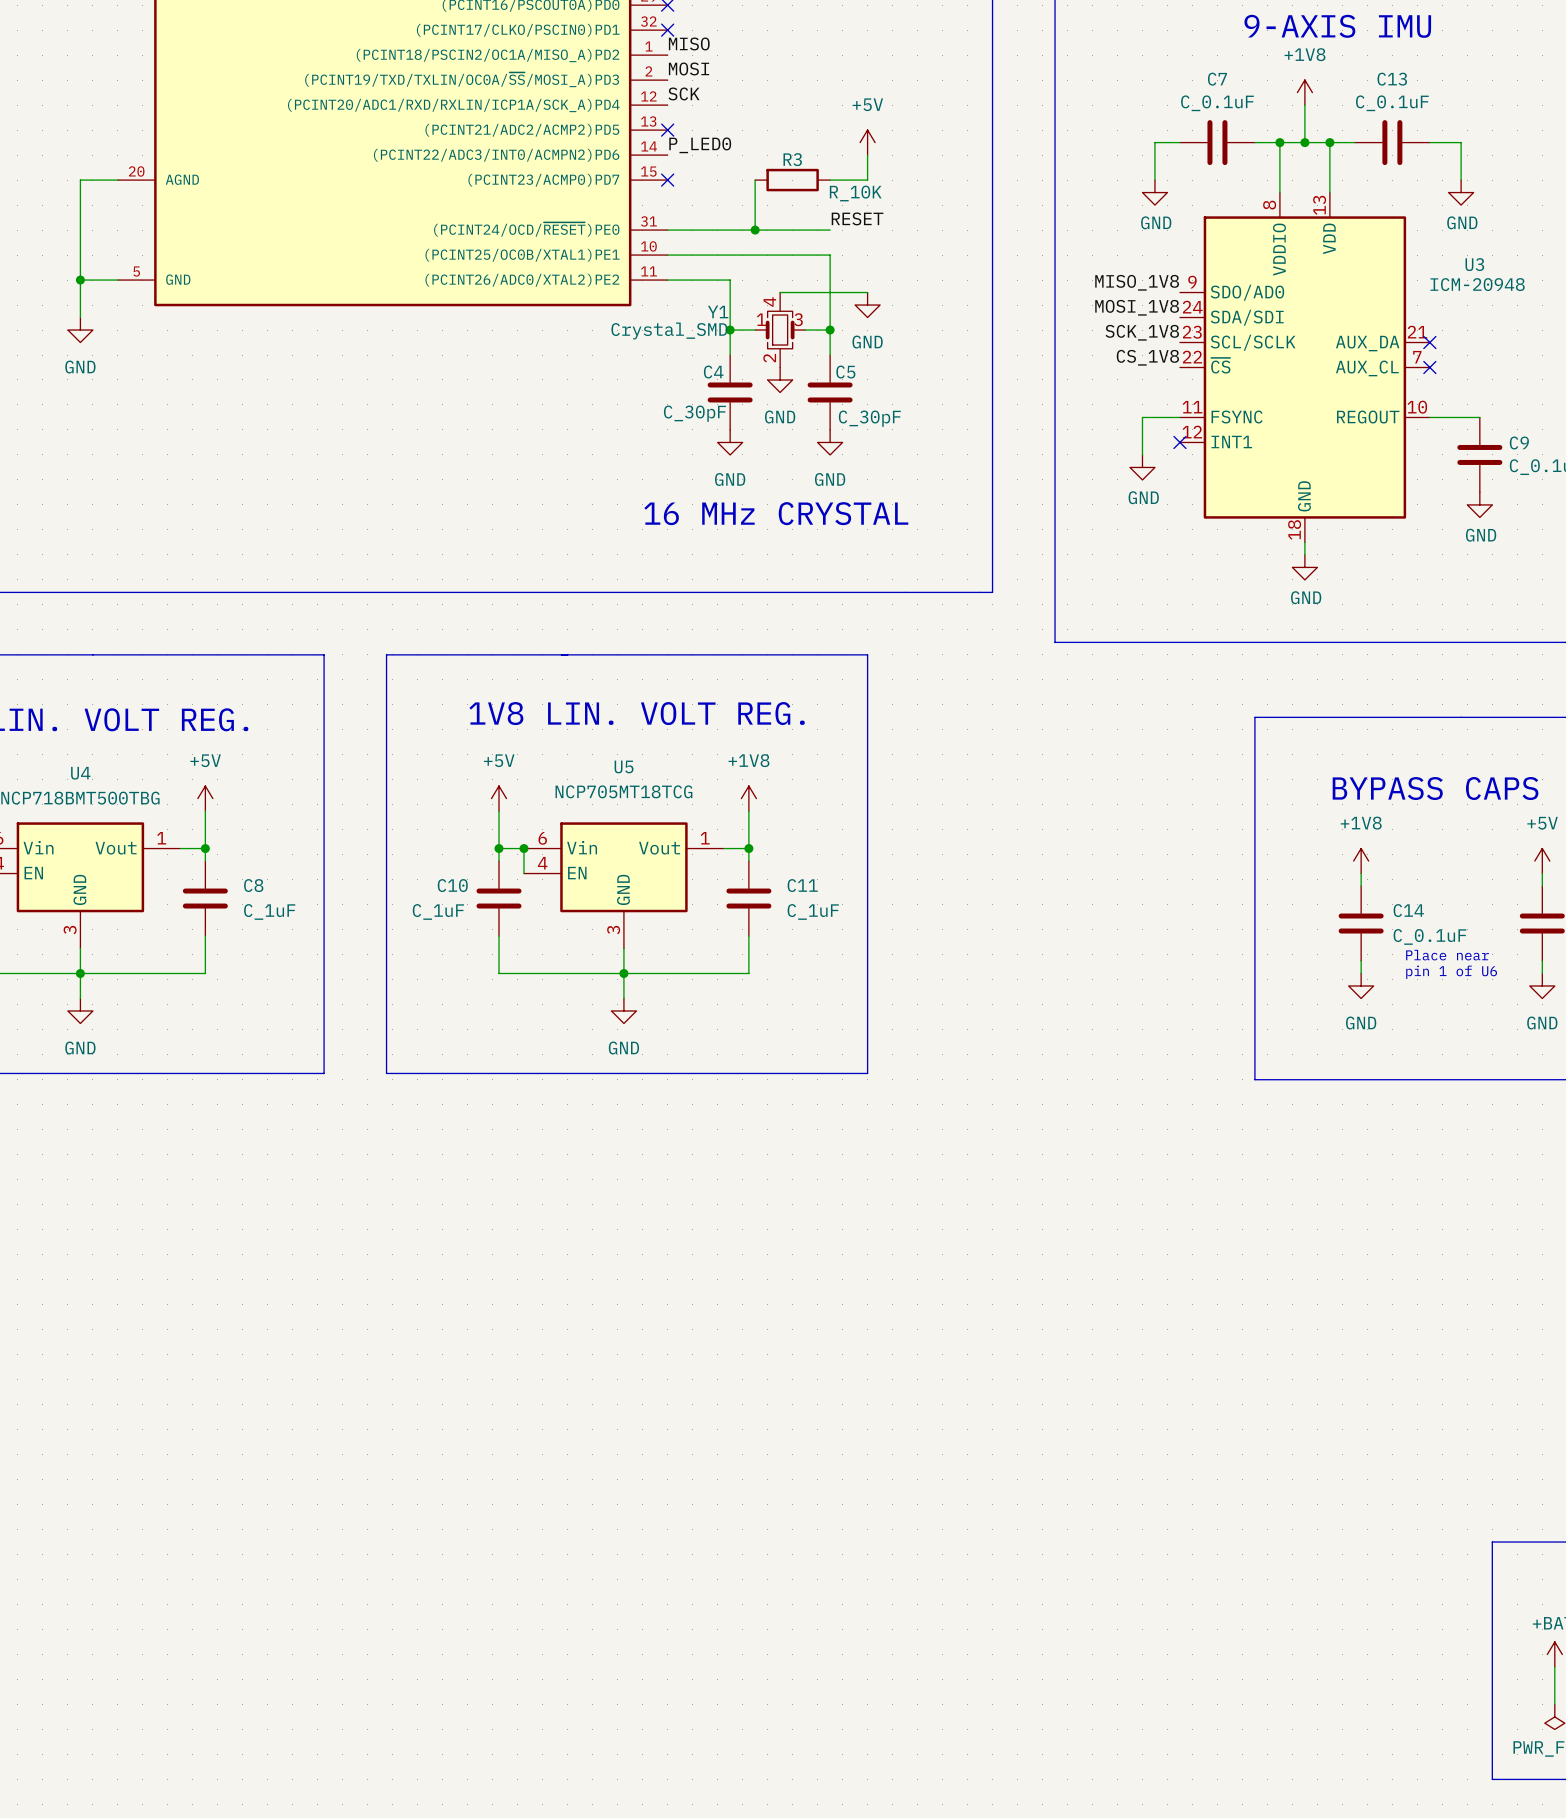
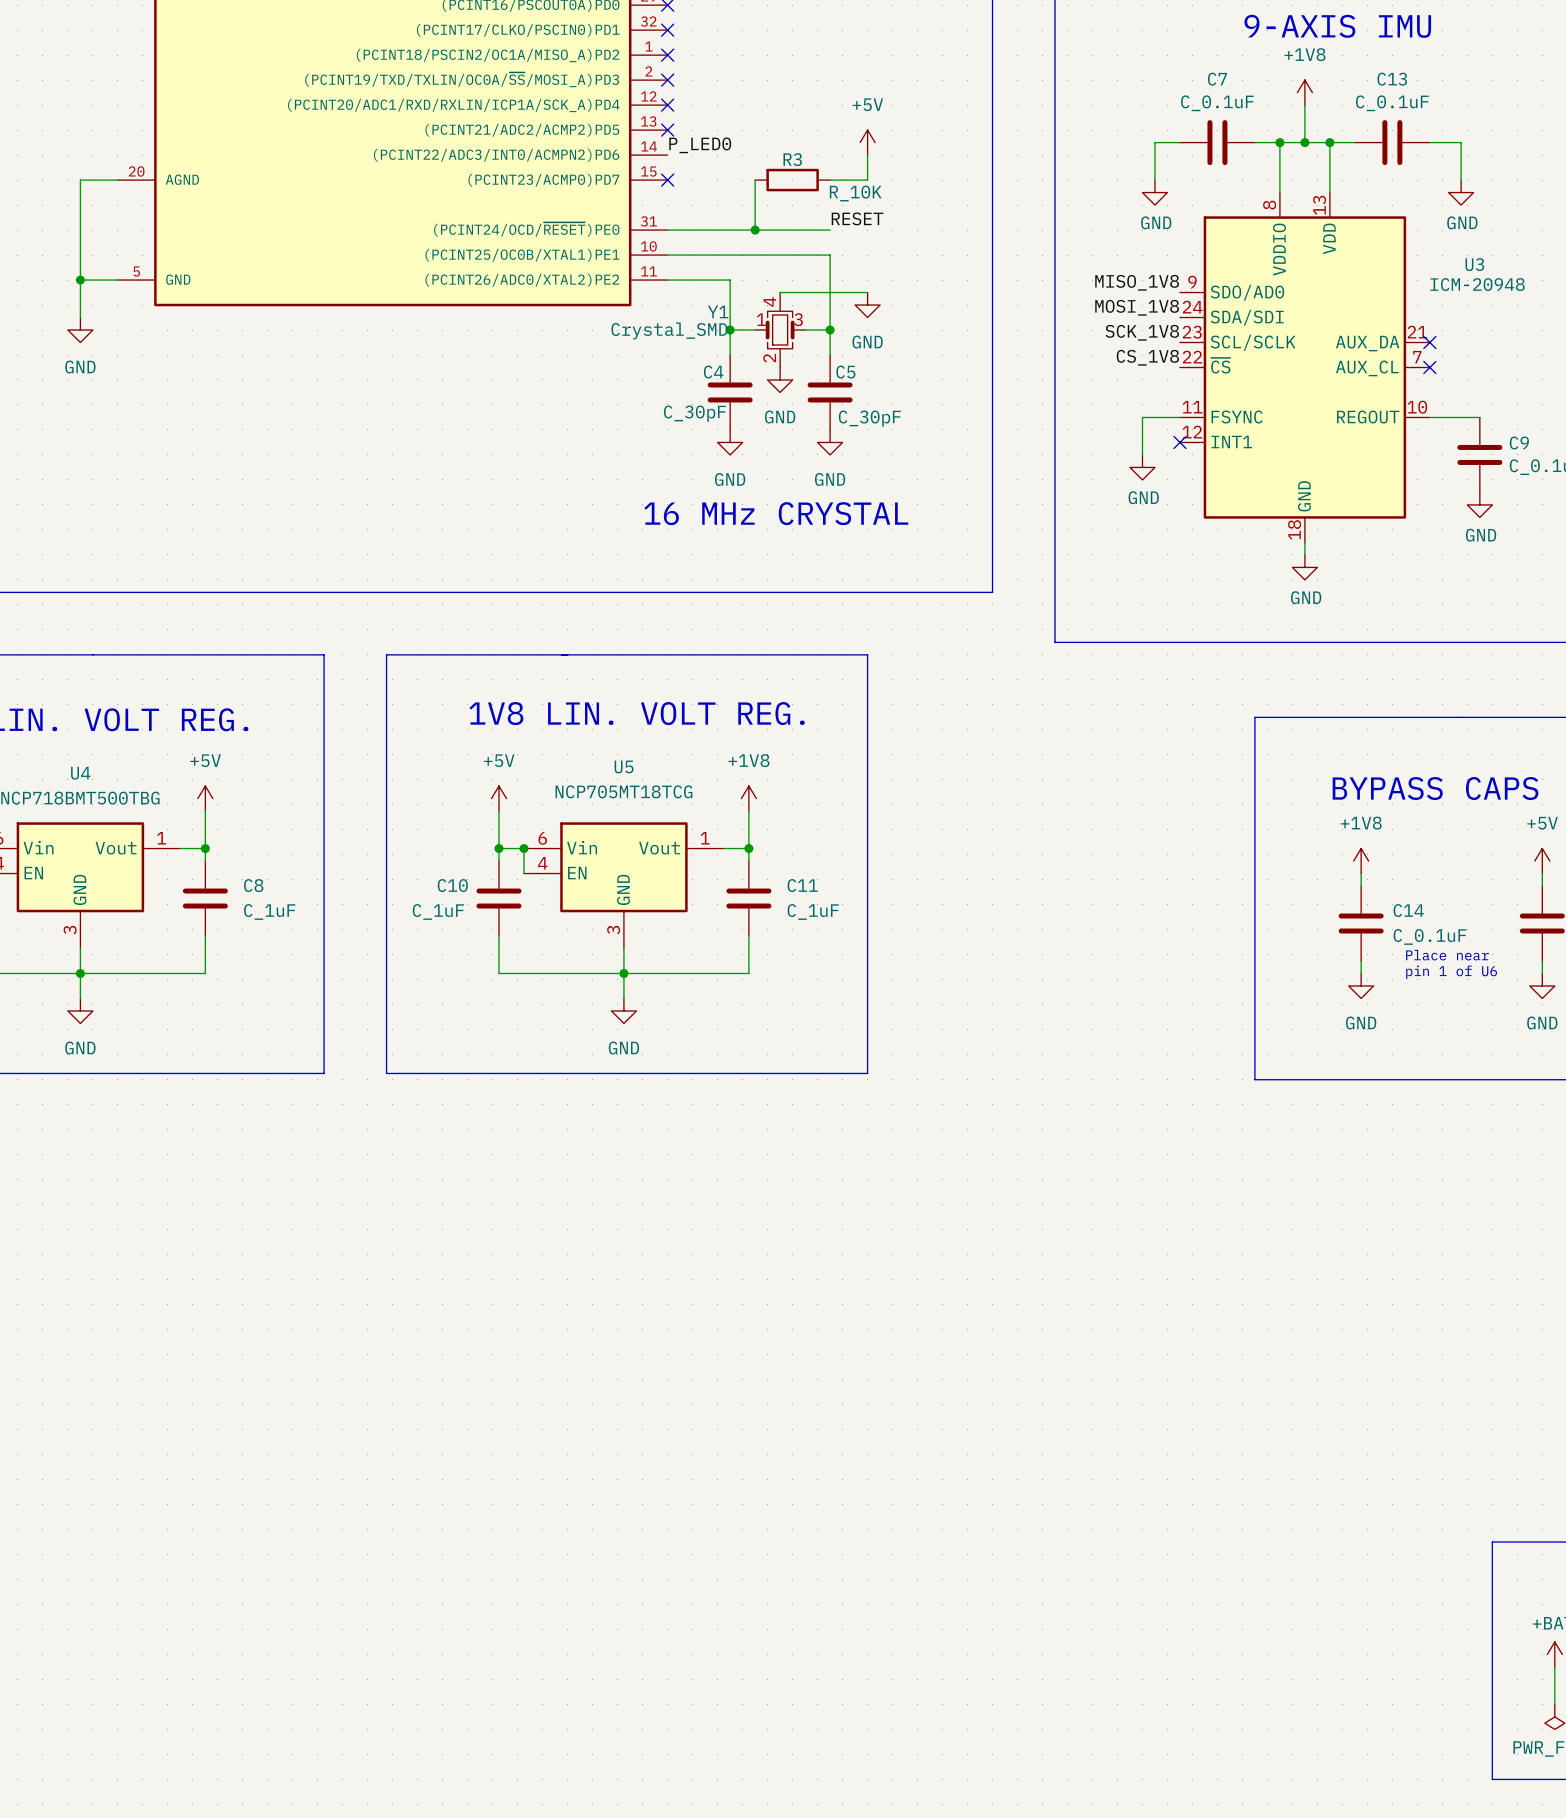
label: MISO (689, 43) -> none
no-connect mark: none -> (667, 55)
label: MOSI (689, 68) -> none
no-connect mark: none -> (667, 80)
label: SCK (683, 93) -> none
no-connect mark: none -> (667, 105)

